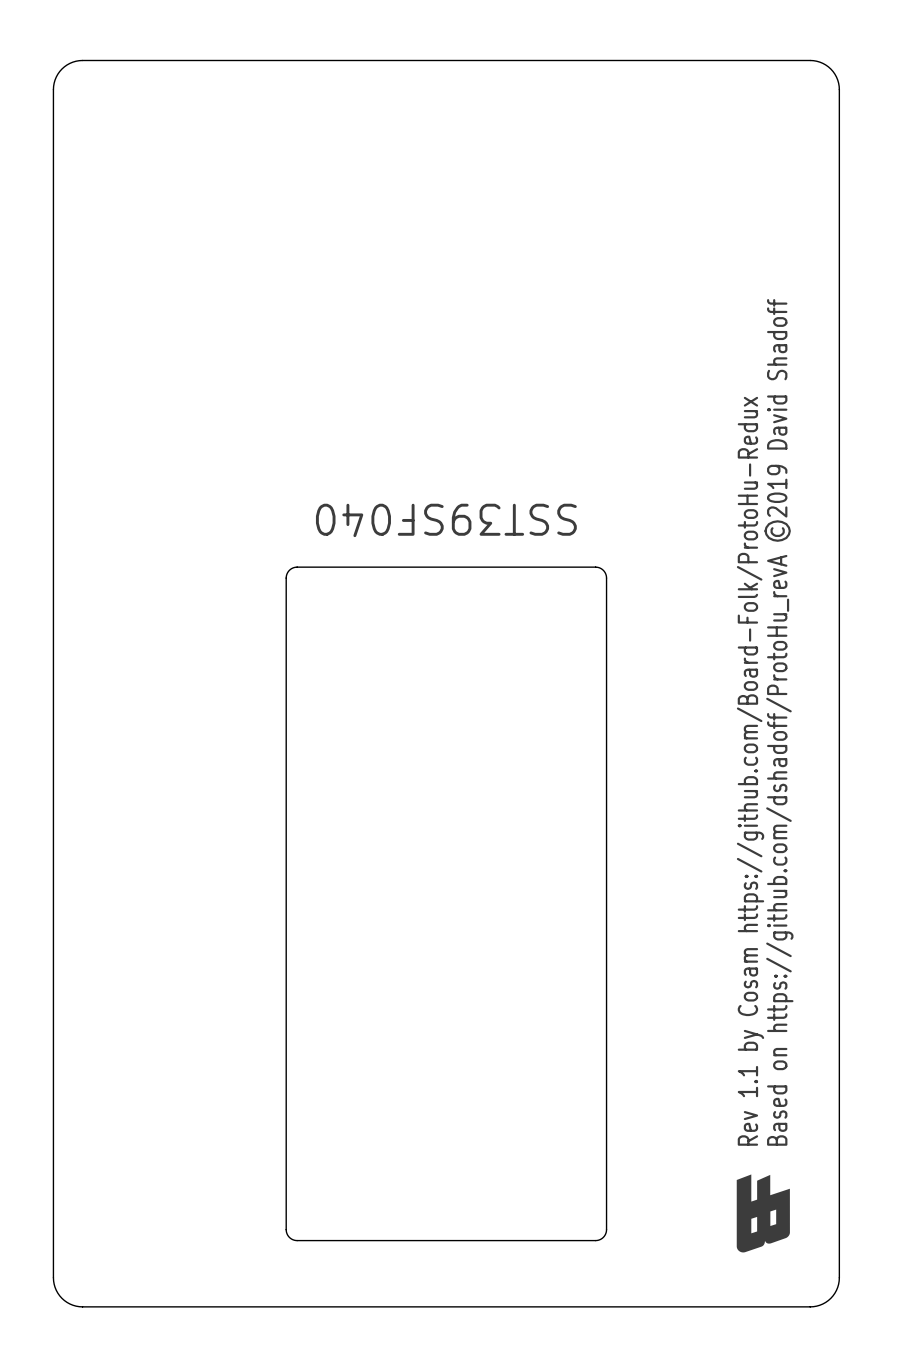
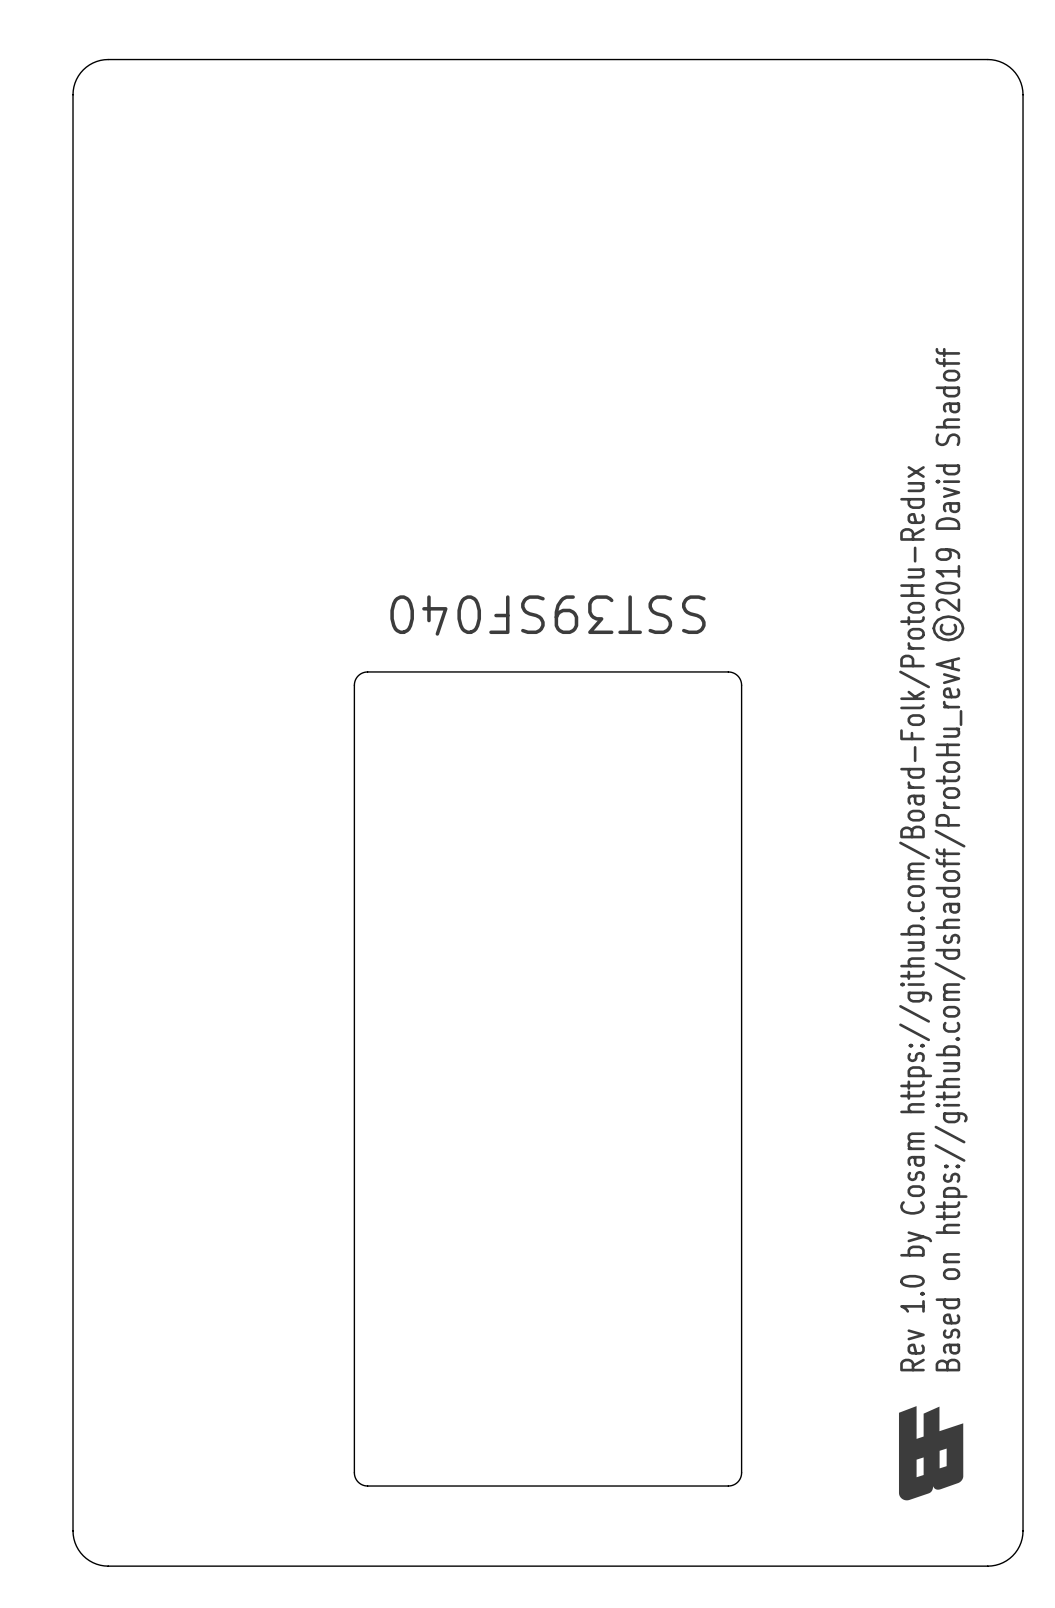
text: Rev 1.1 by Cosam https://github.com/Board-Folk/ProtoHu-Redux (750, 771) -> Rev 1.0 by Cosam https://github.com/Board-Folk/ProtoHu-Redux (915, 918)

